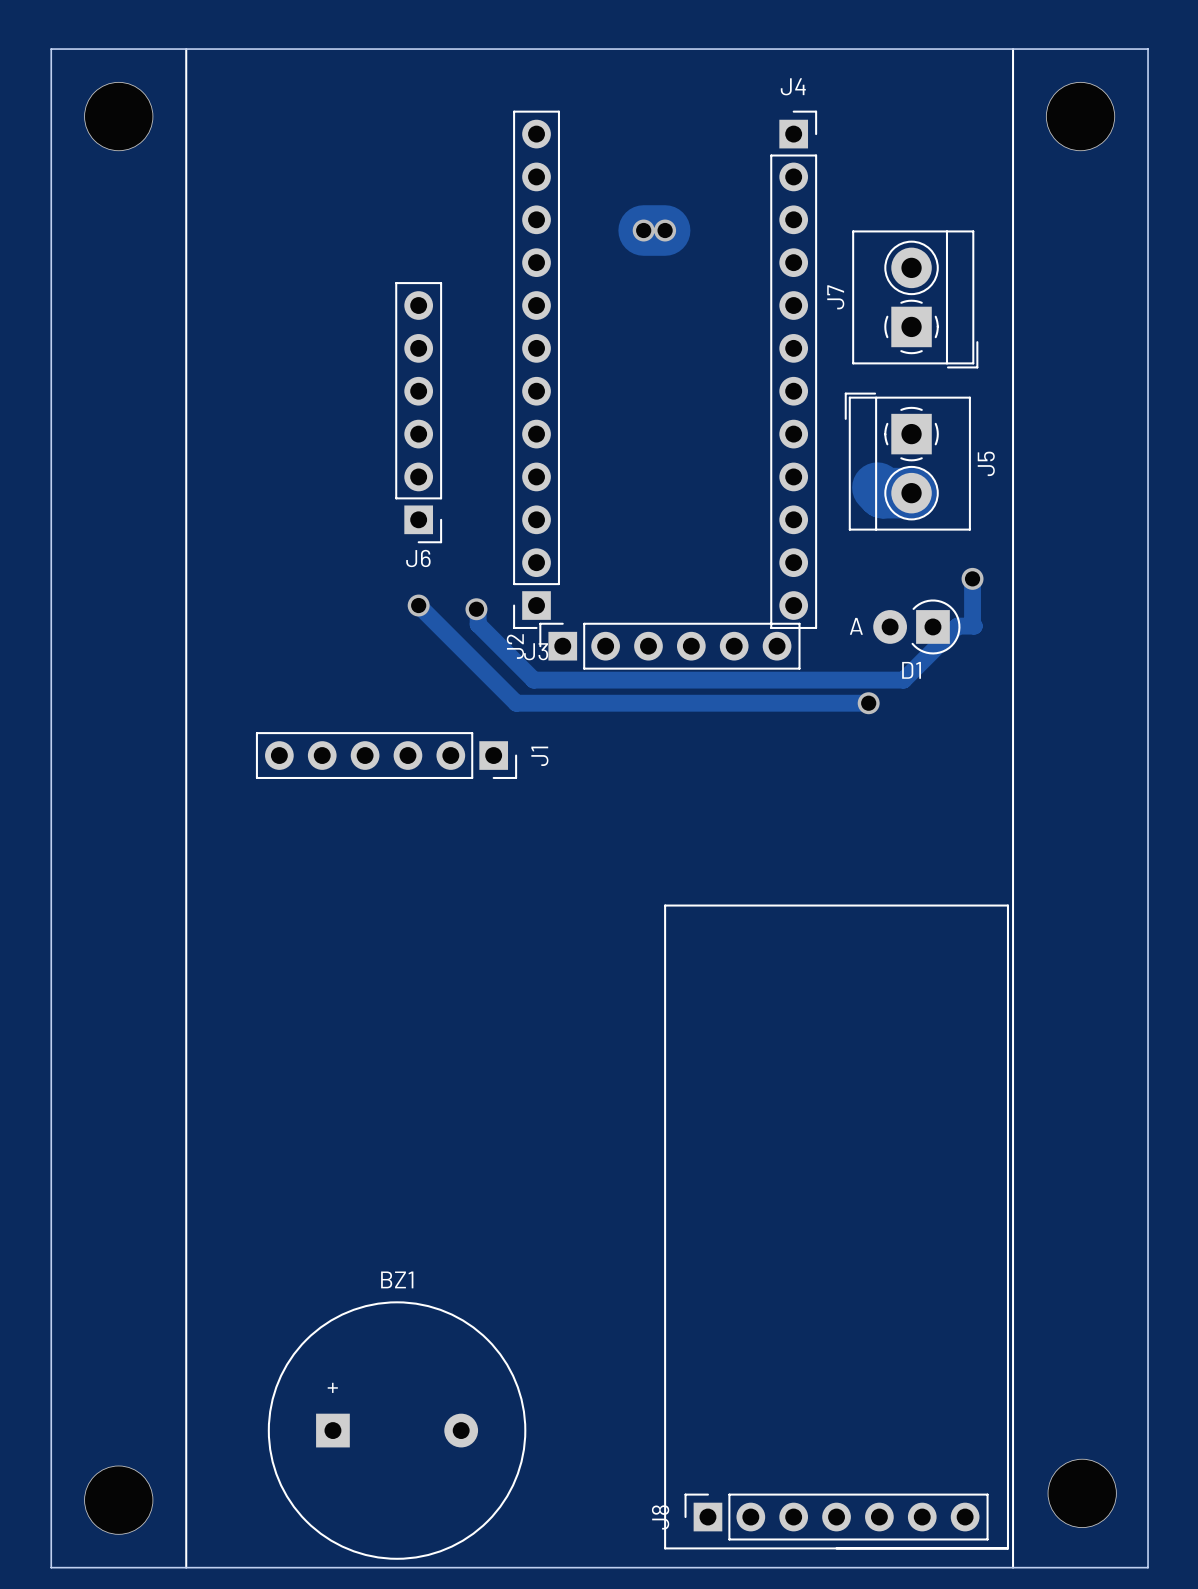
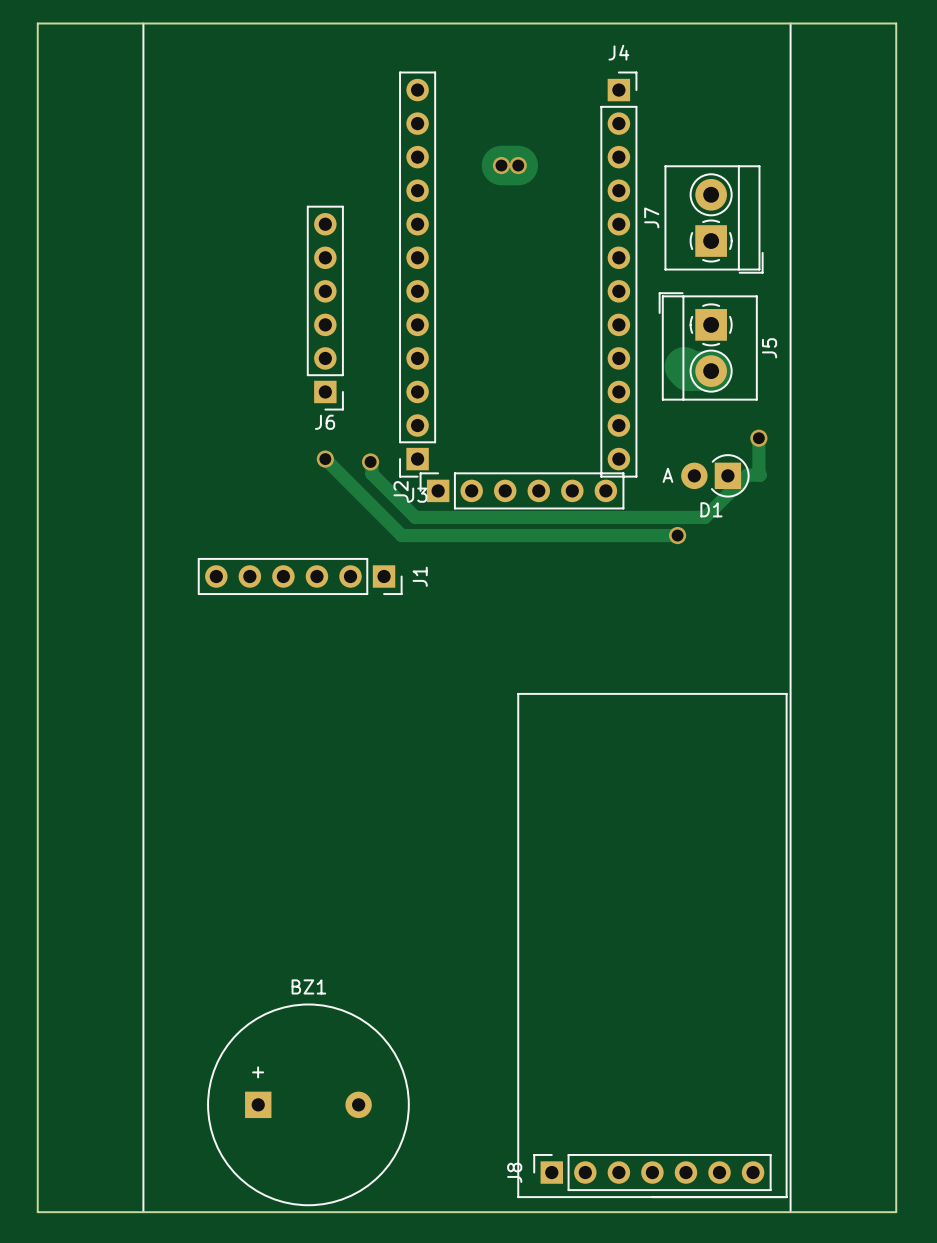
via: (118, 116) -> none
via: (1080, 116) -> none
via: (1082, 1493) -> none
via: (118, 1500) -> none

